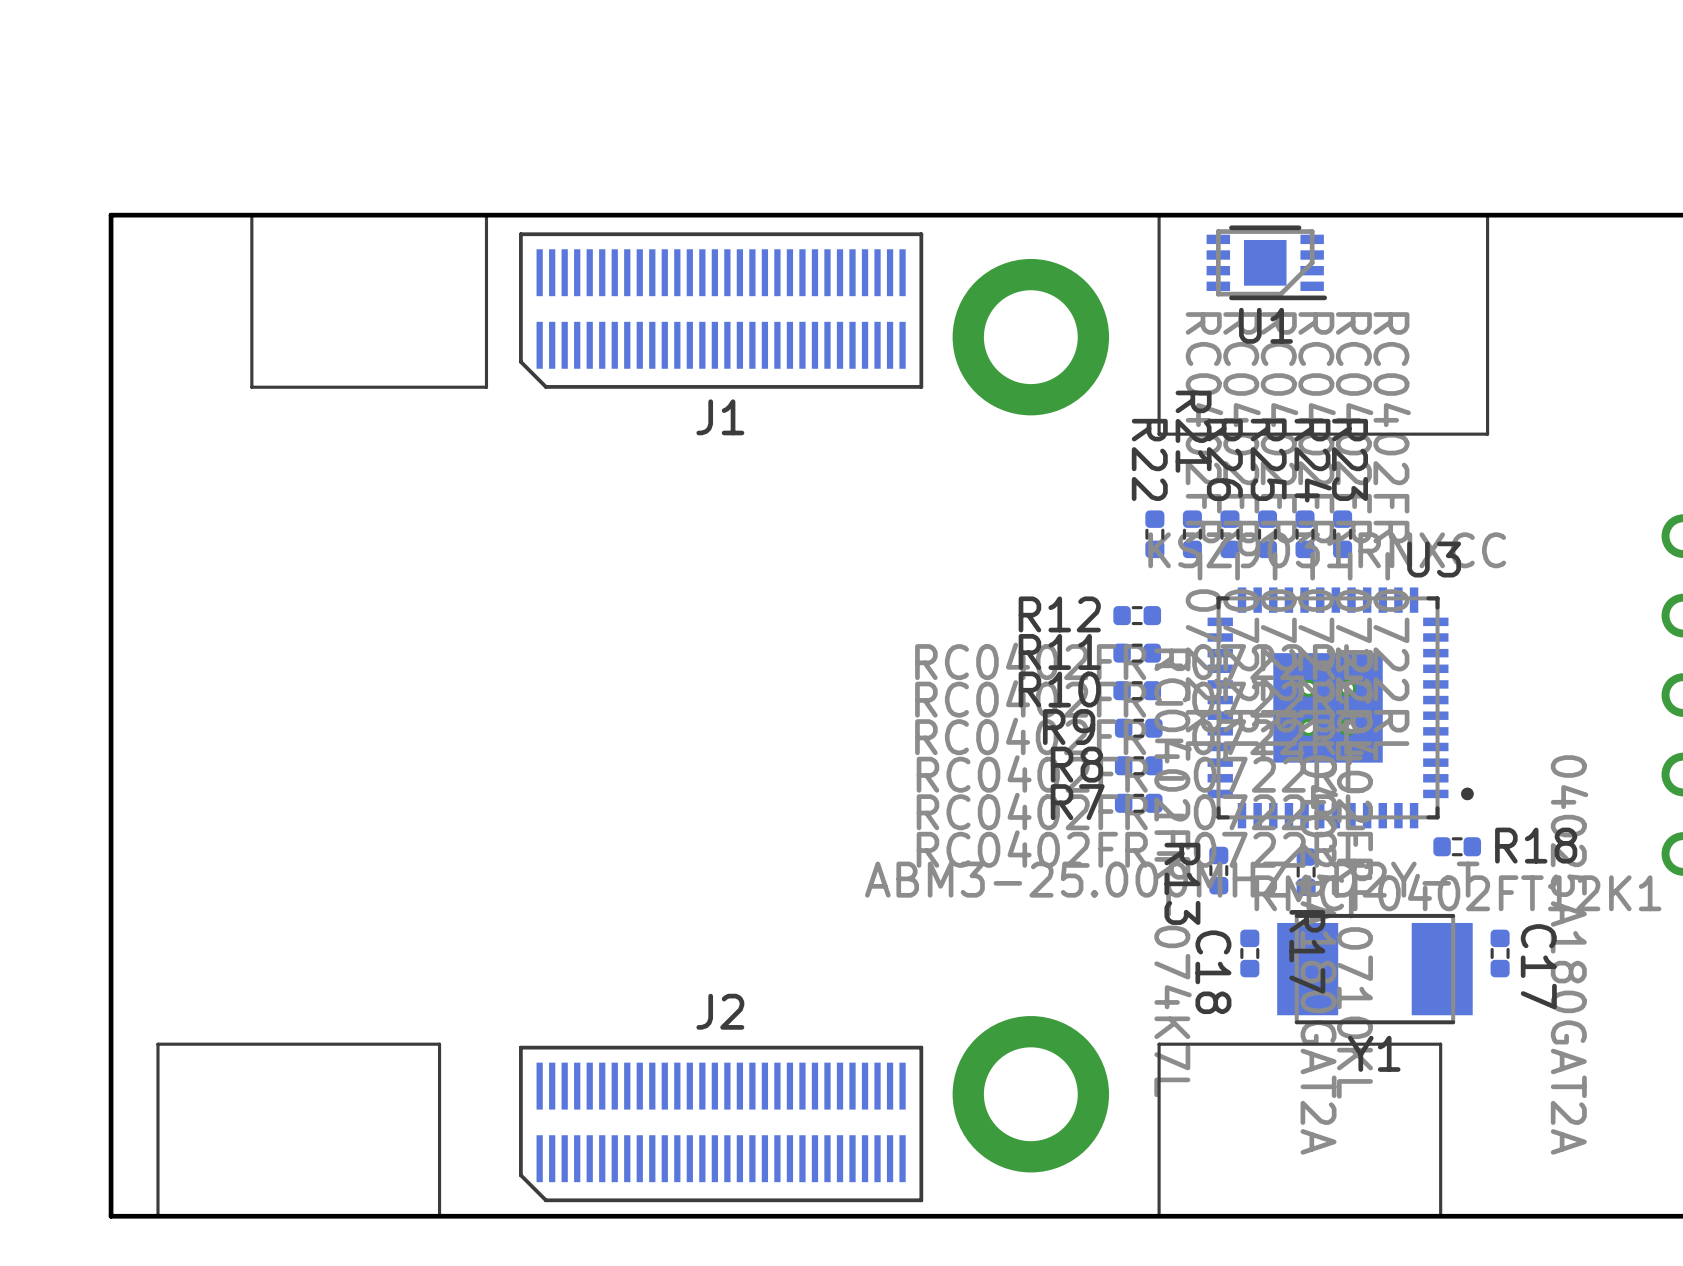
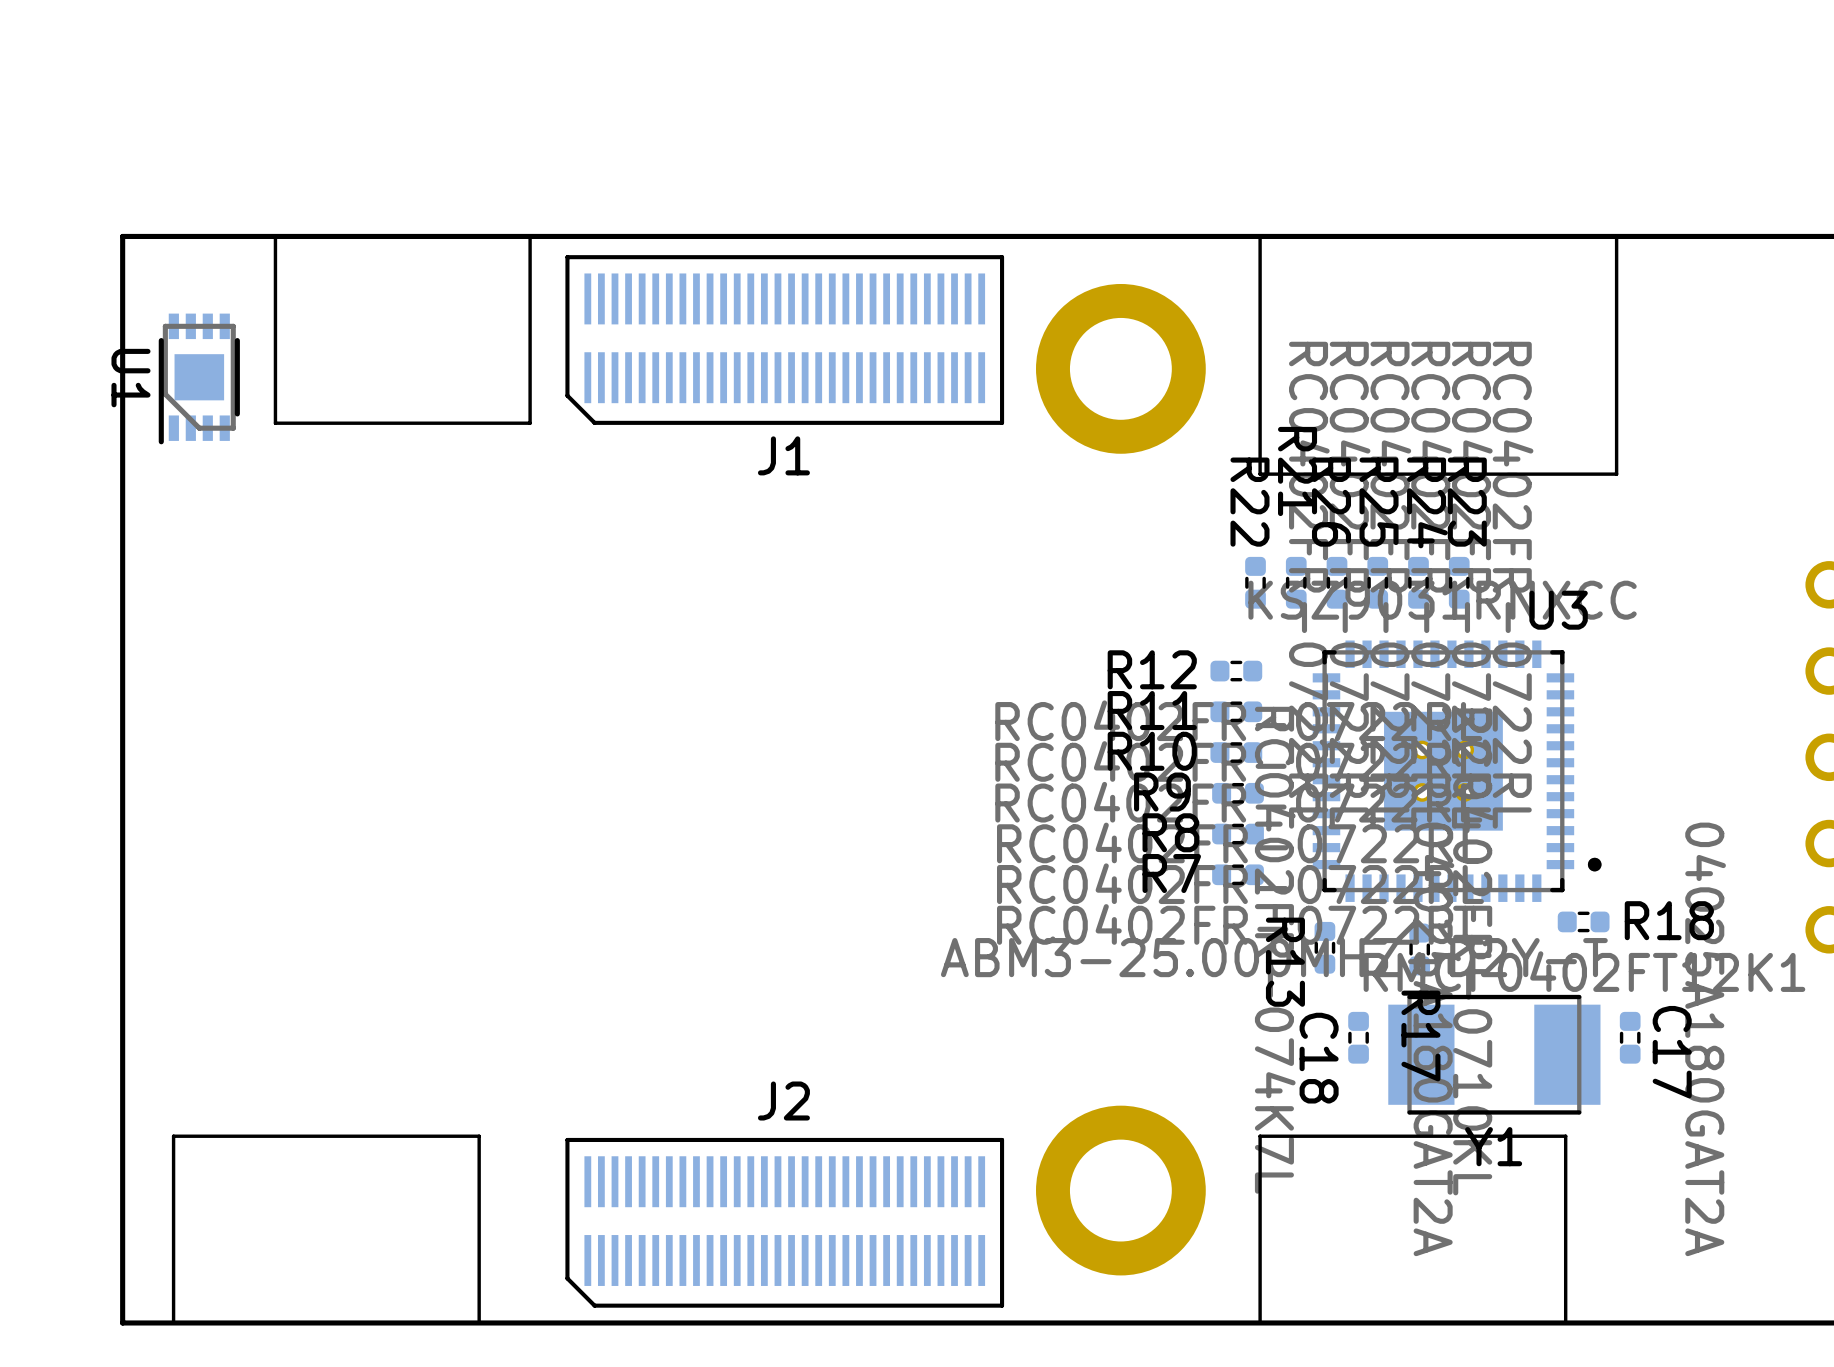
U1 rotation: 0° (1266, 262) -> 90° clockwise (199, 378)
U1 position: (1266, 262) -> (199, 378)

